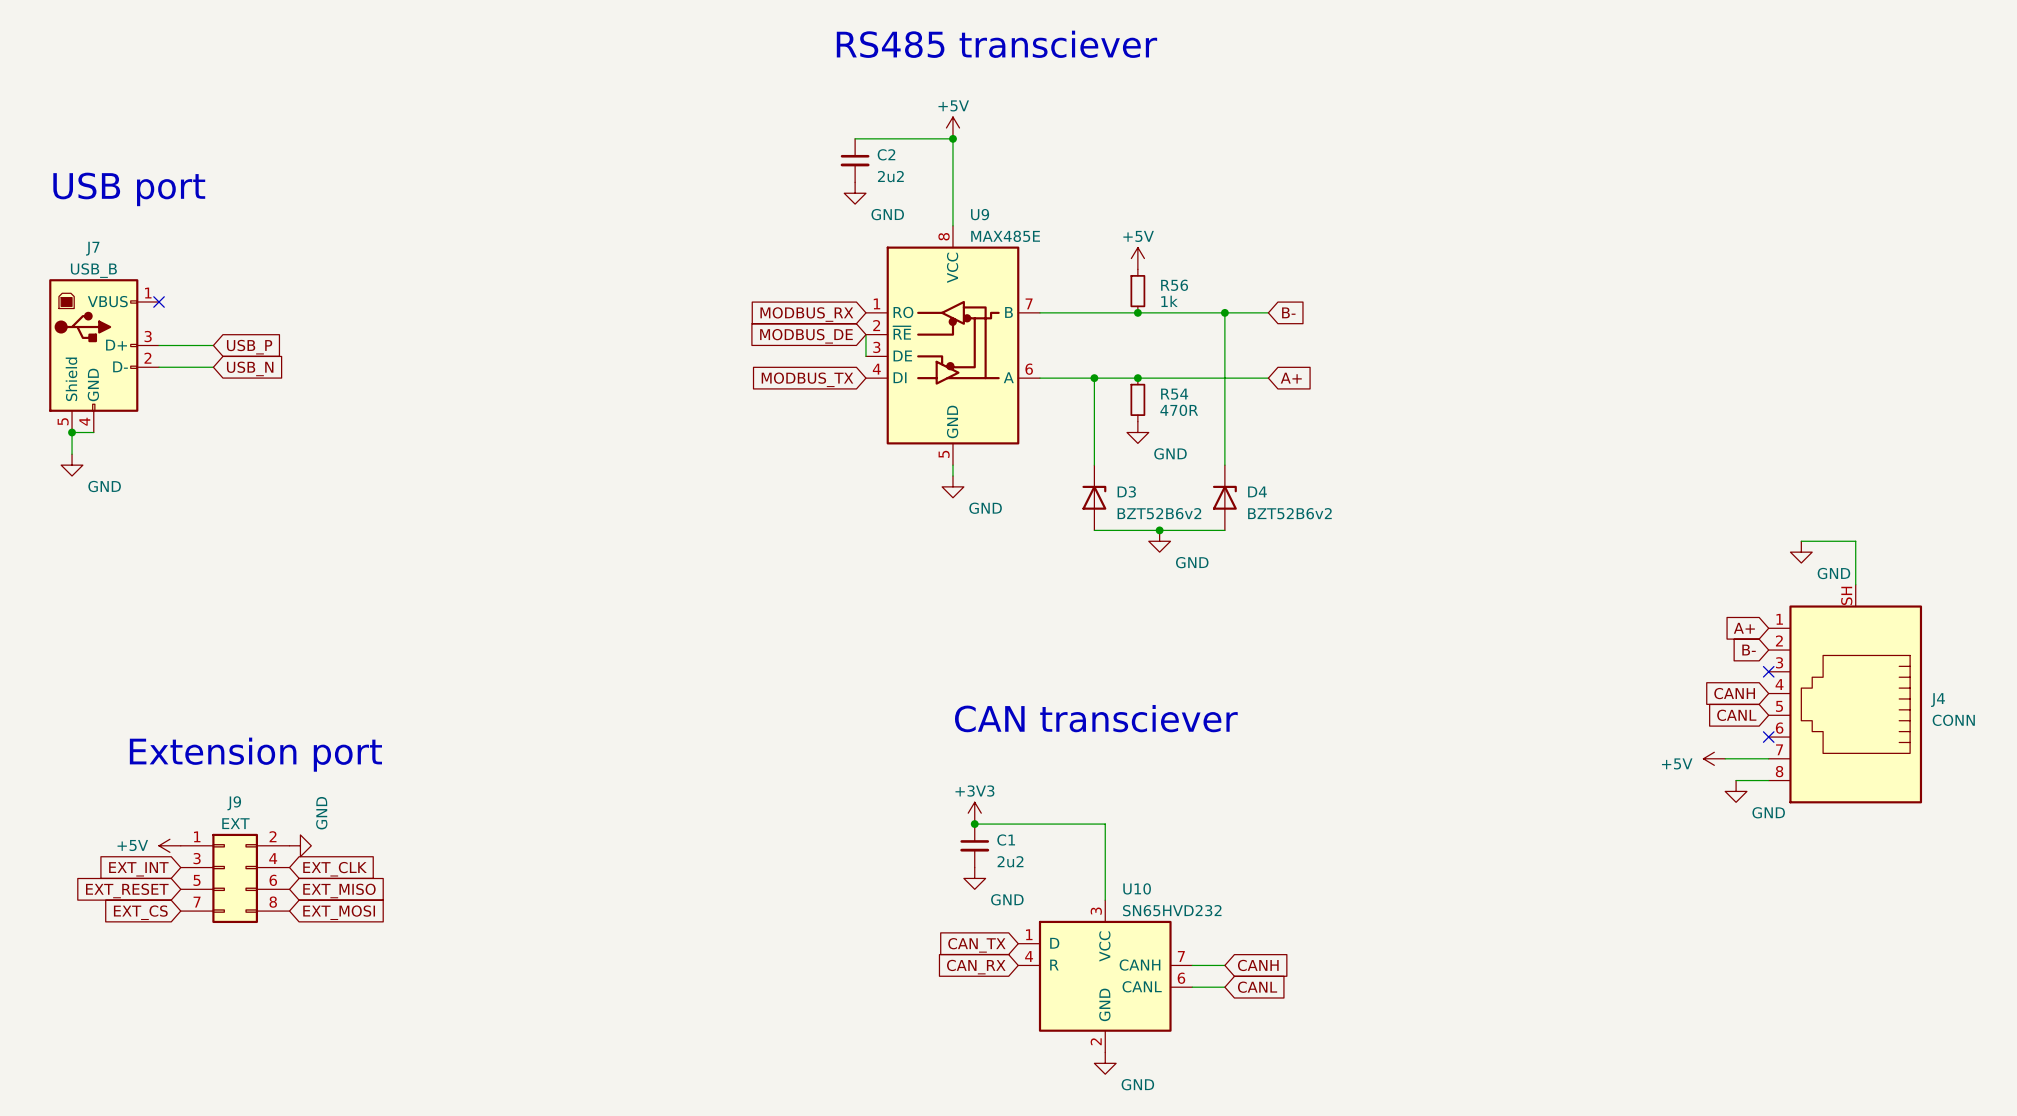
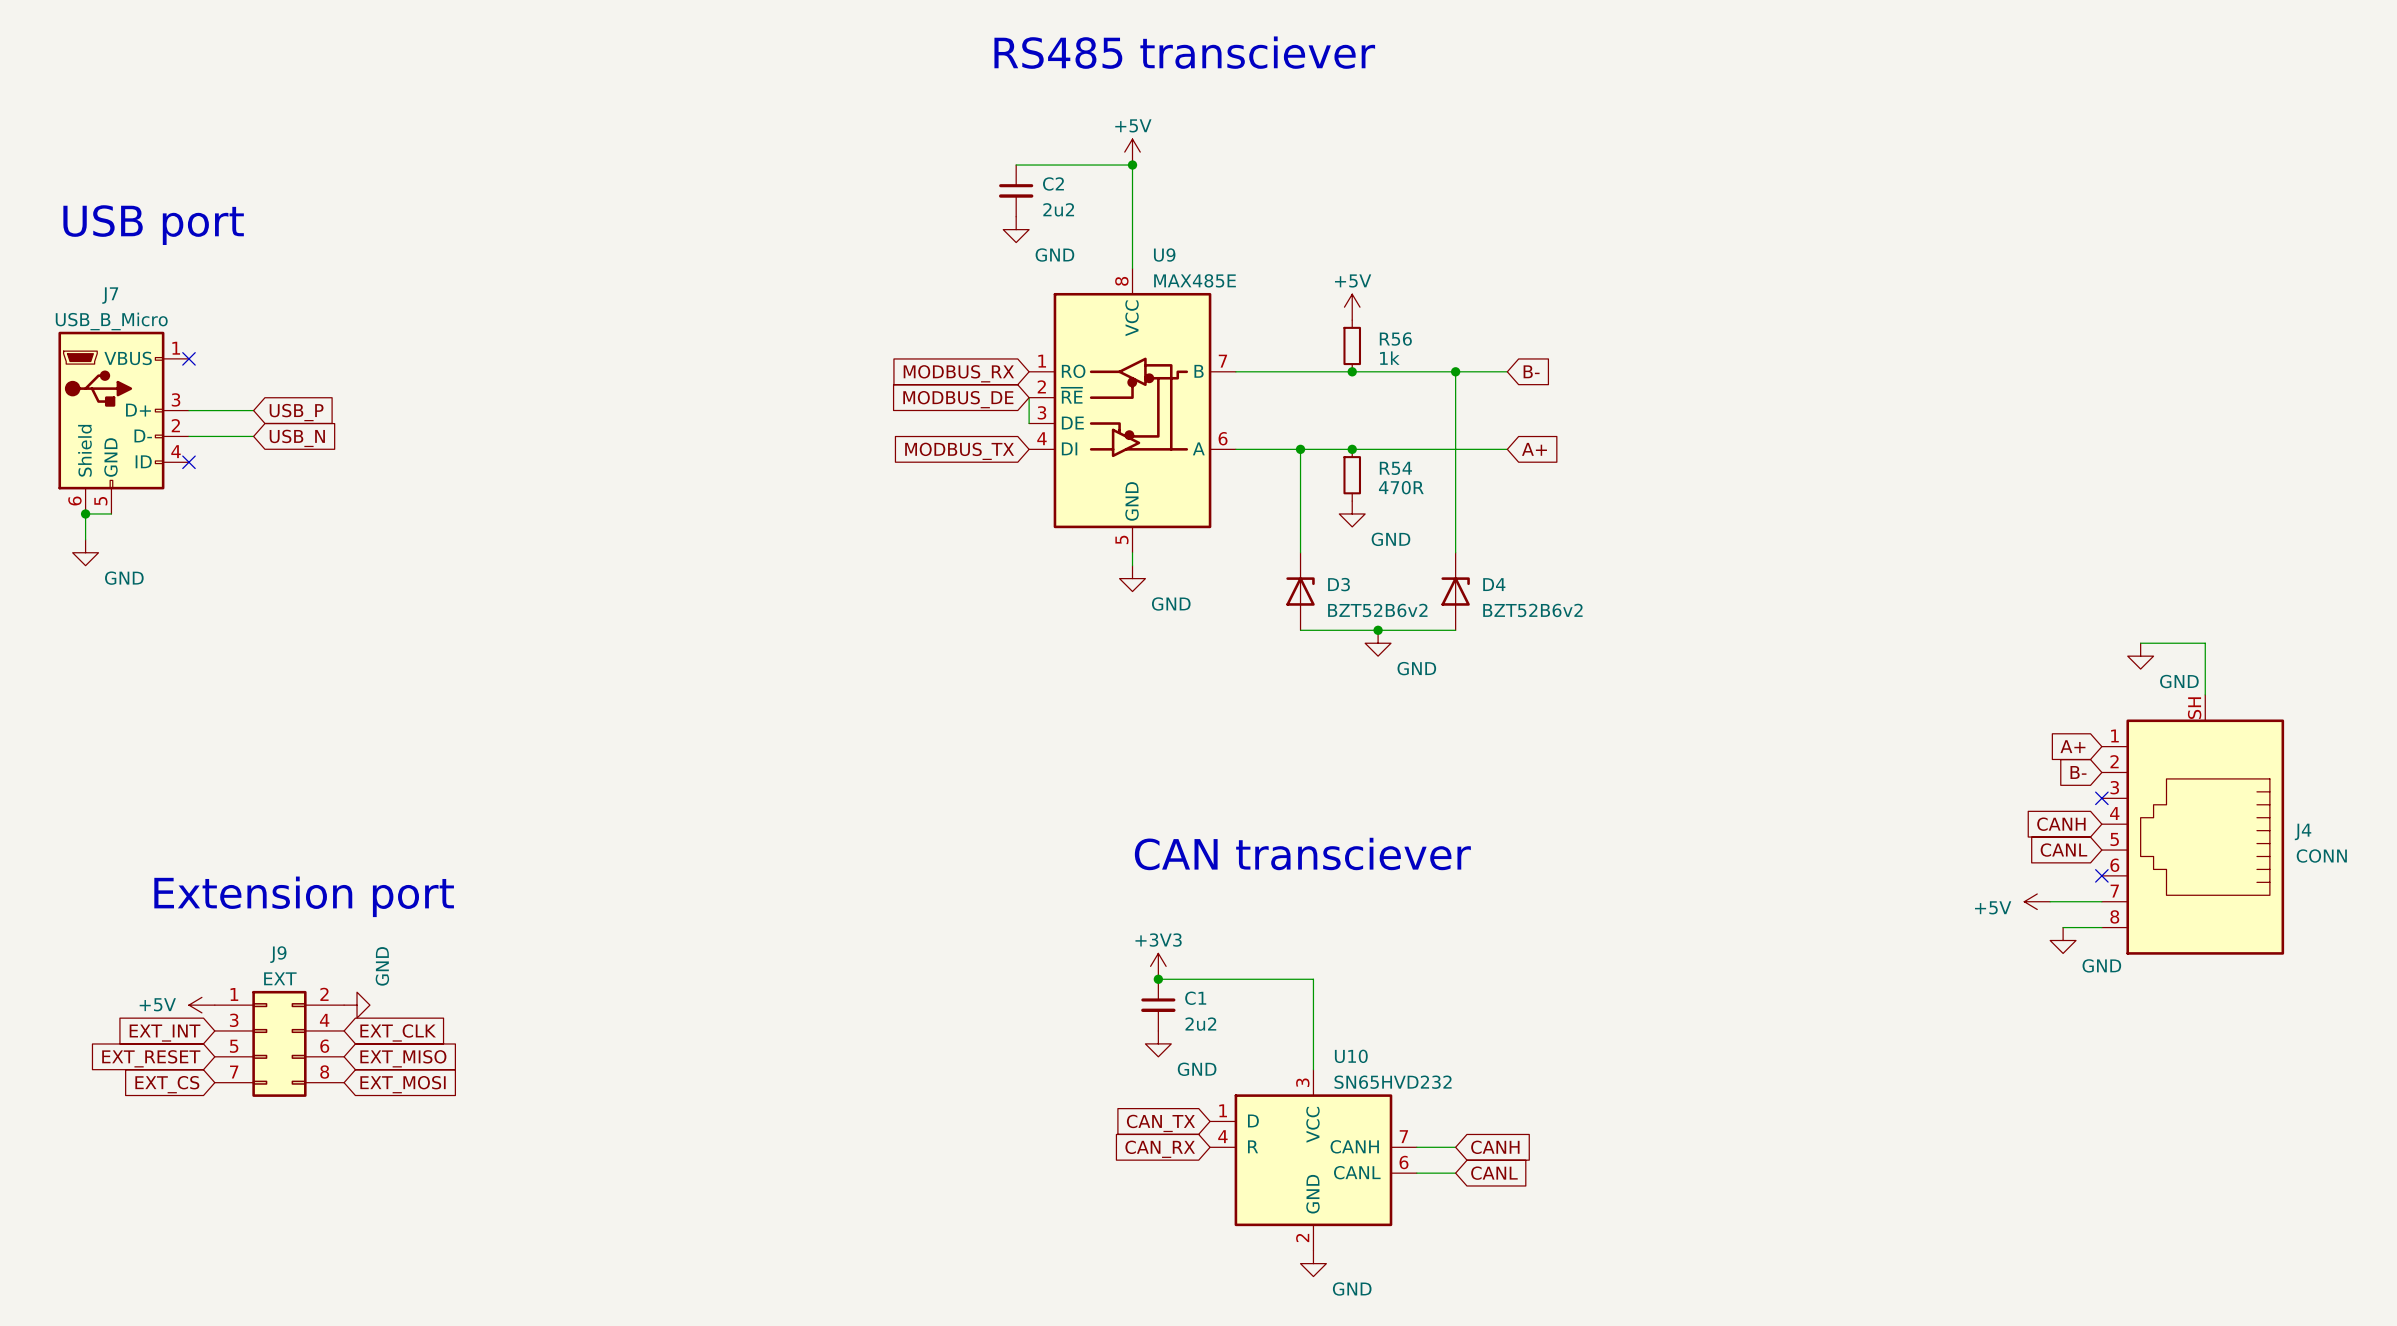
J7 value: USB_B (93, 270) -> USB_B_Micro (111, 321)
J7 symbol: [49, 279, 160, 433] -> [58, 331, 189, 514]
no-connect mark: none -> (188, 462)

